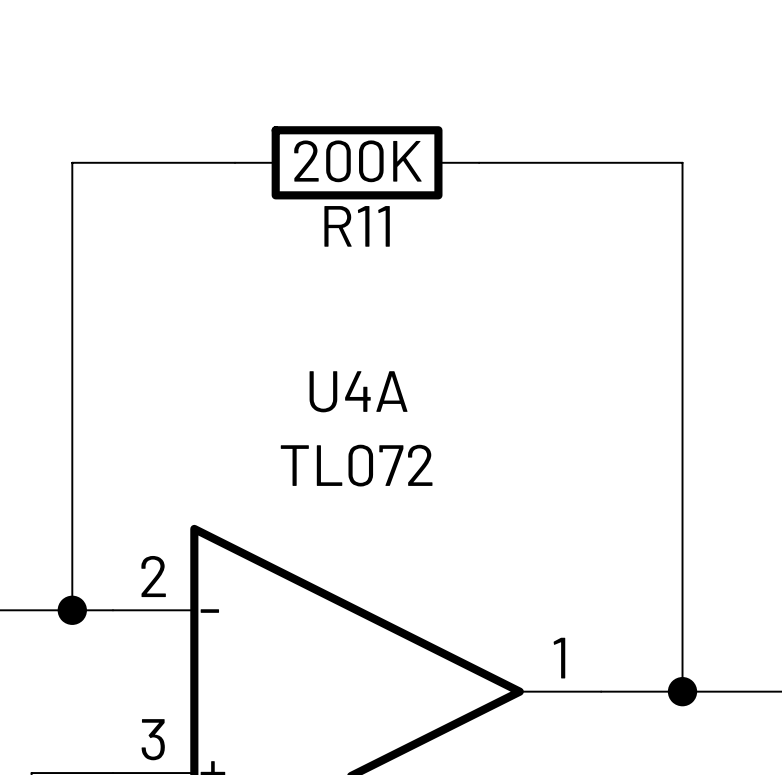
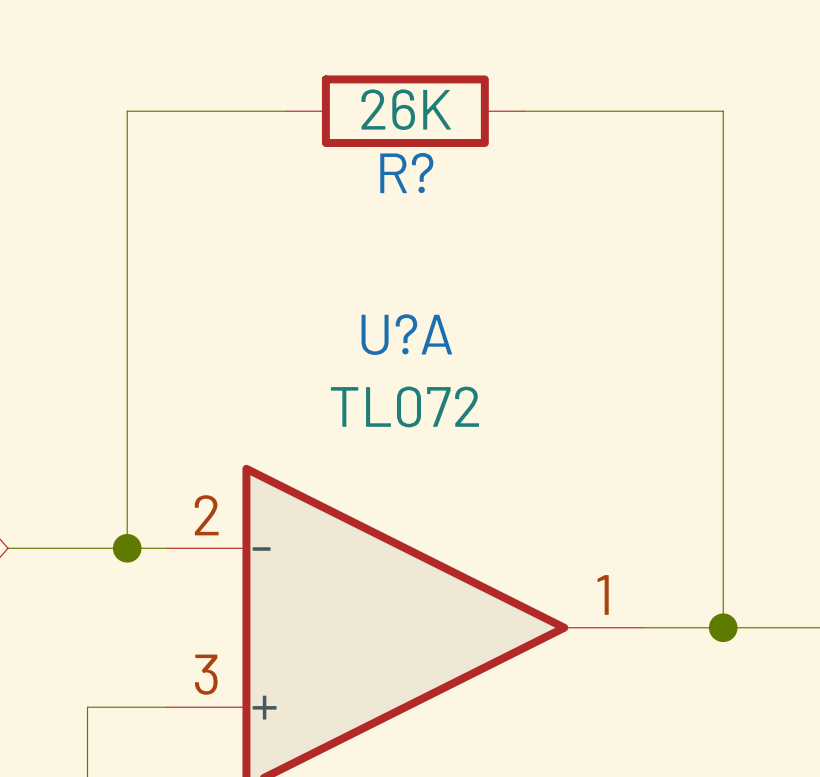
R11 value: 200K (357, 161) -> 26K (406, 109)
R11 name: R11 (357, 226) -> R? (406, 173)
U4A name: U4A (358, 391) -> U?A (406, 334)

